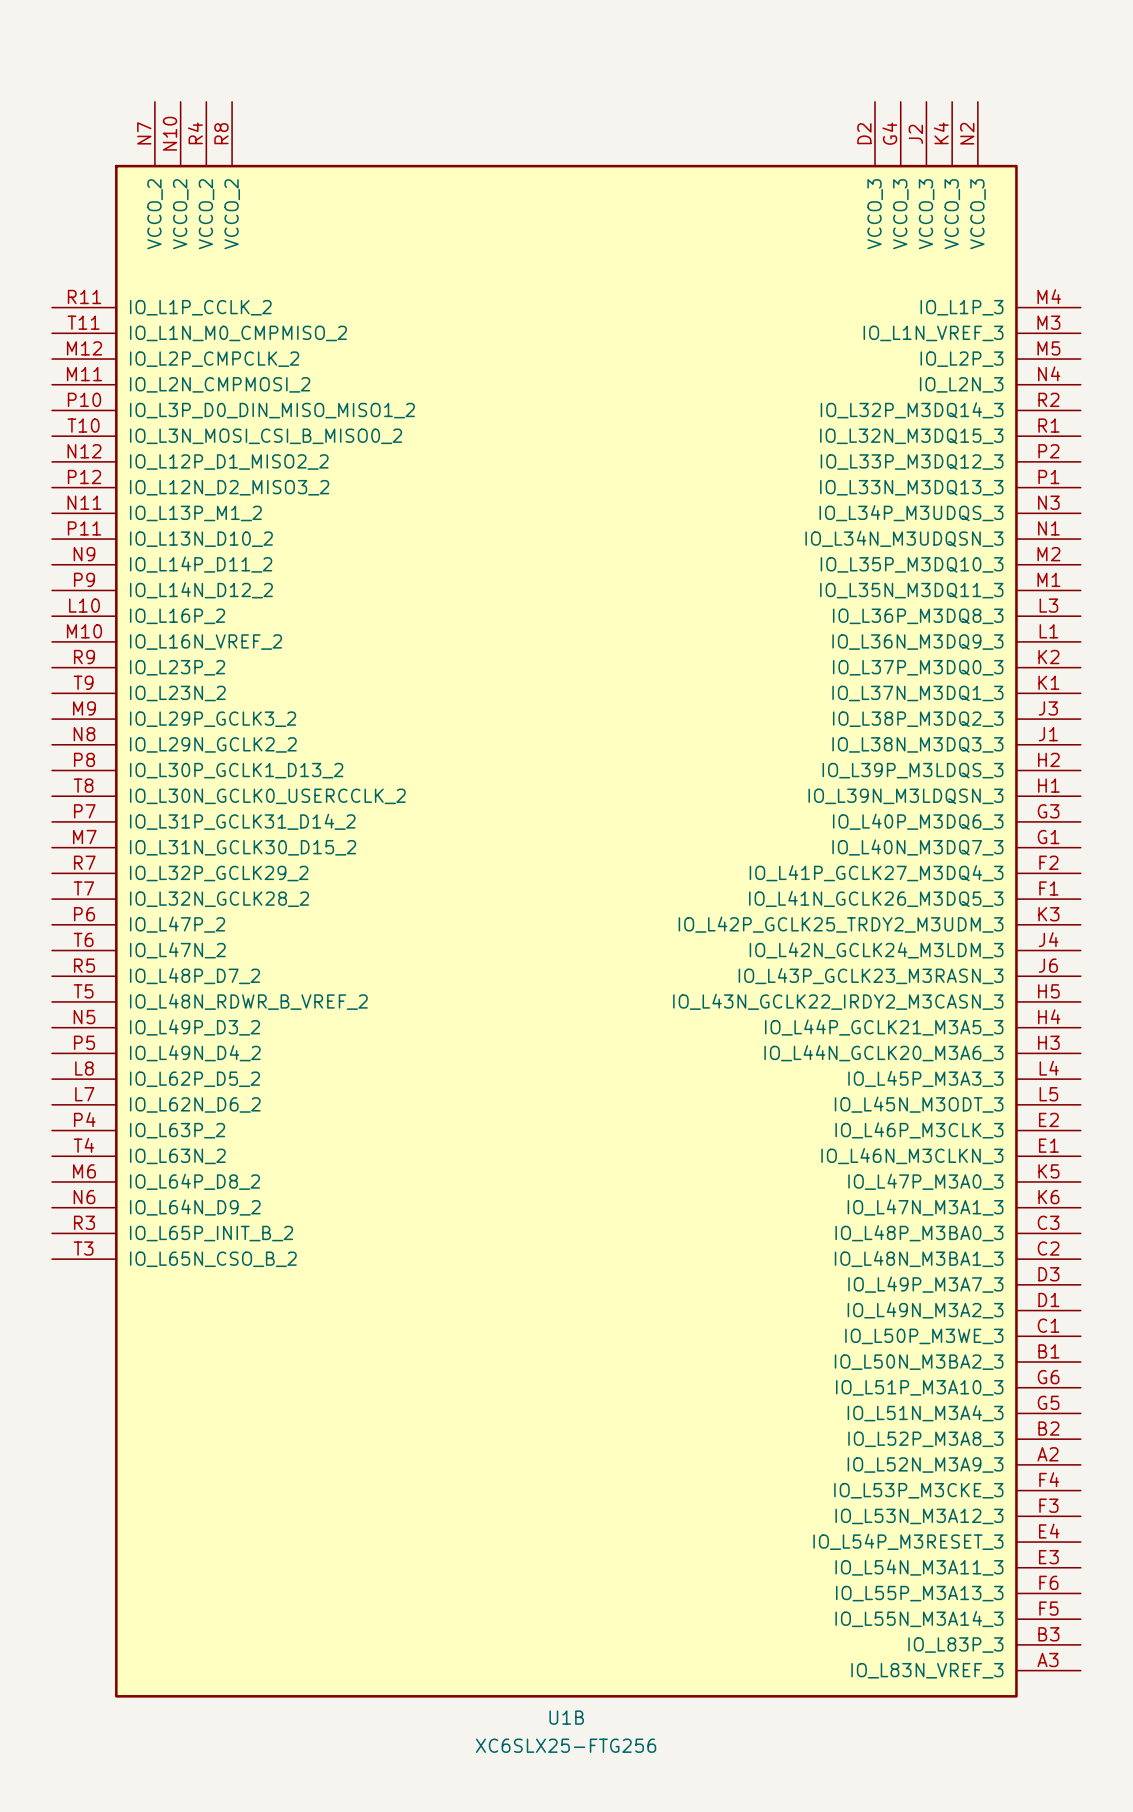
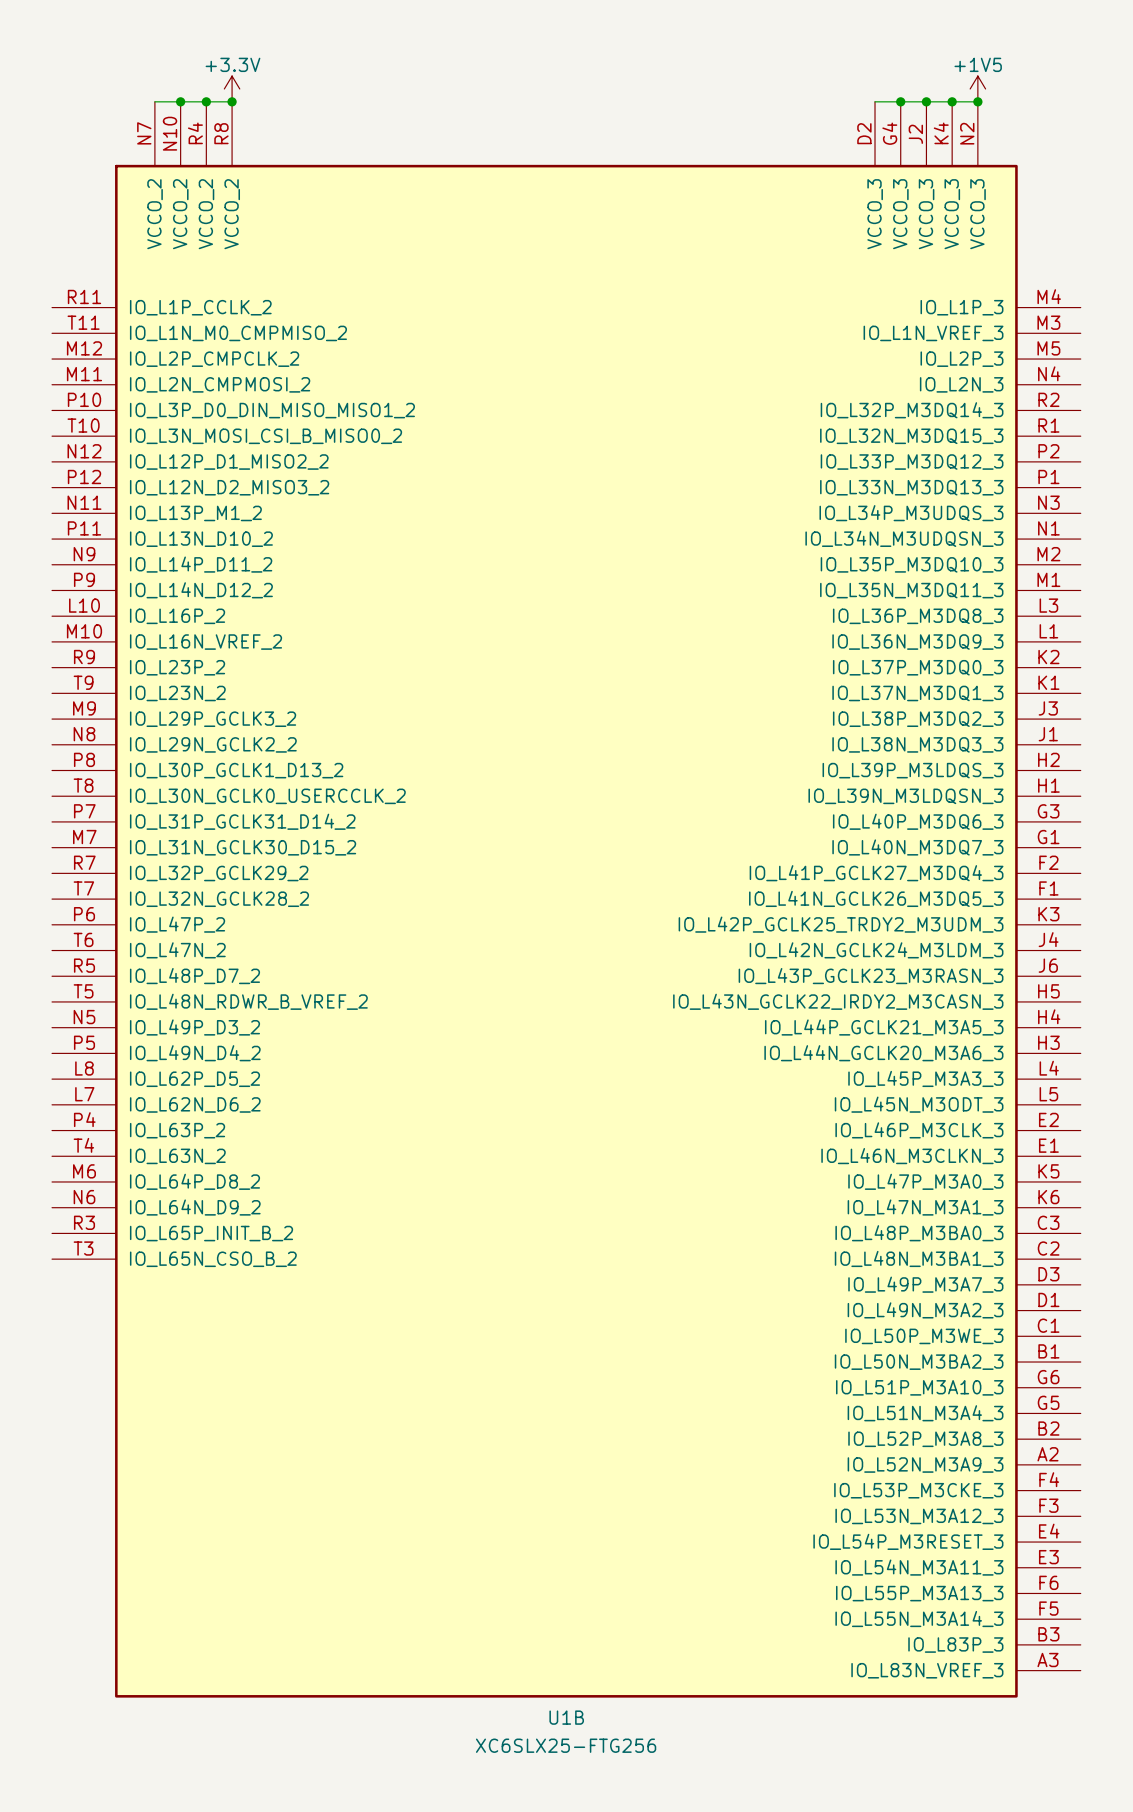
power symbol: none -> +3.3V (232, 88)
power symbol: none -> +1V5 (977, 88)
wire: none -> (154, 101) (232, 101)
junction: none -> (180, 101)
junction: none -> (206, 101)
junction: none -> (232, 101)
wire: none -> (875, 101) (977, 101)
junction: none -> (900, 101)
junction: none -> (926, 101)
junction: none -> (952, 101)
junction: none -> (977, 101)

